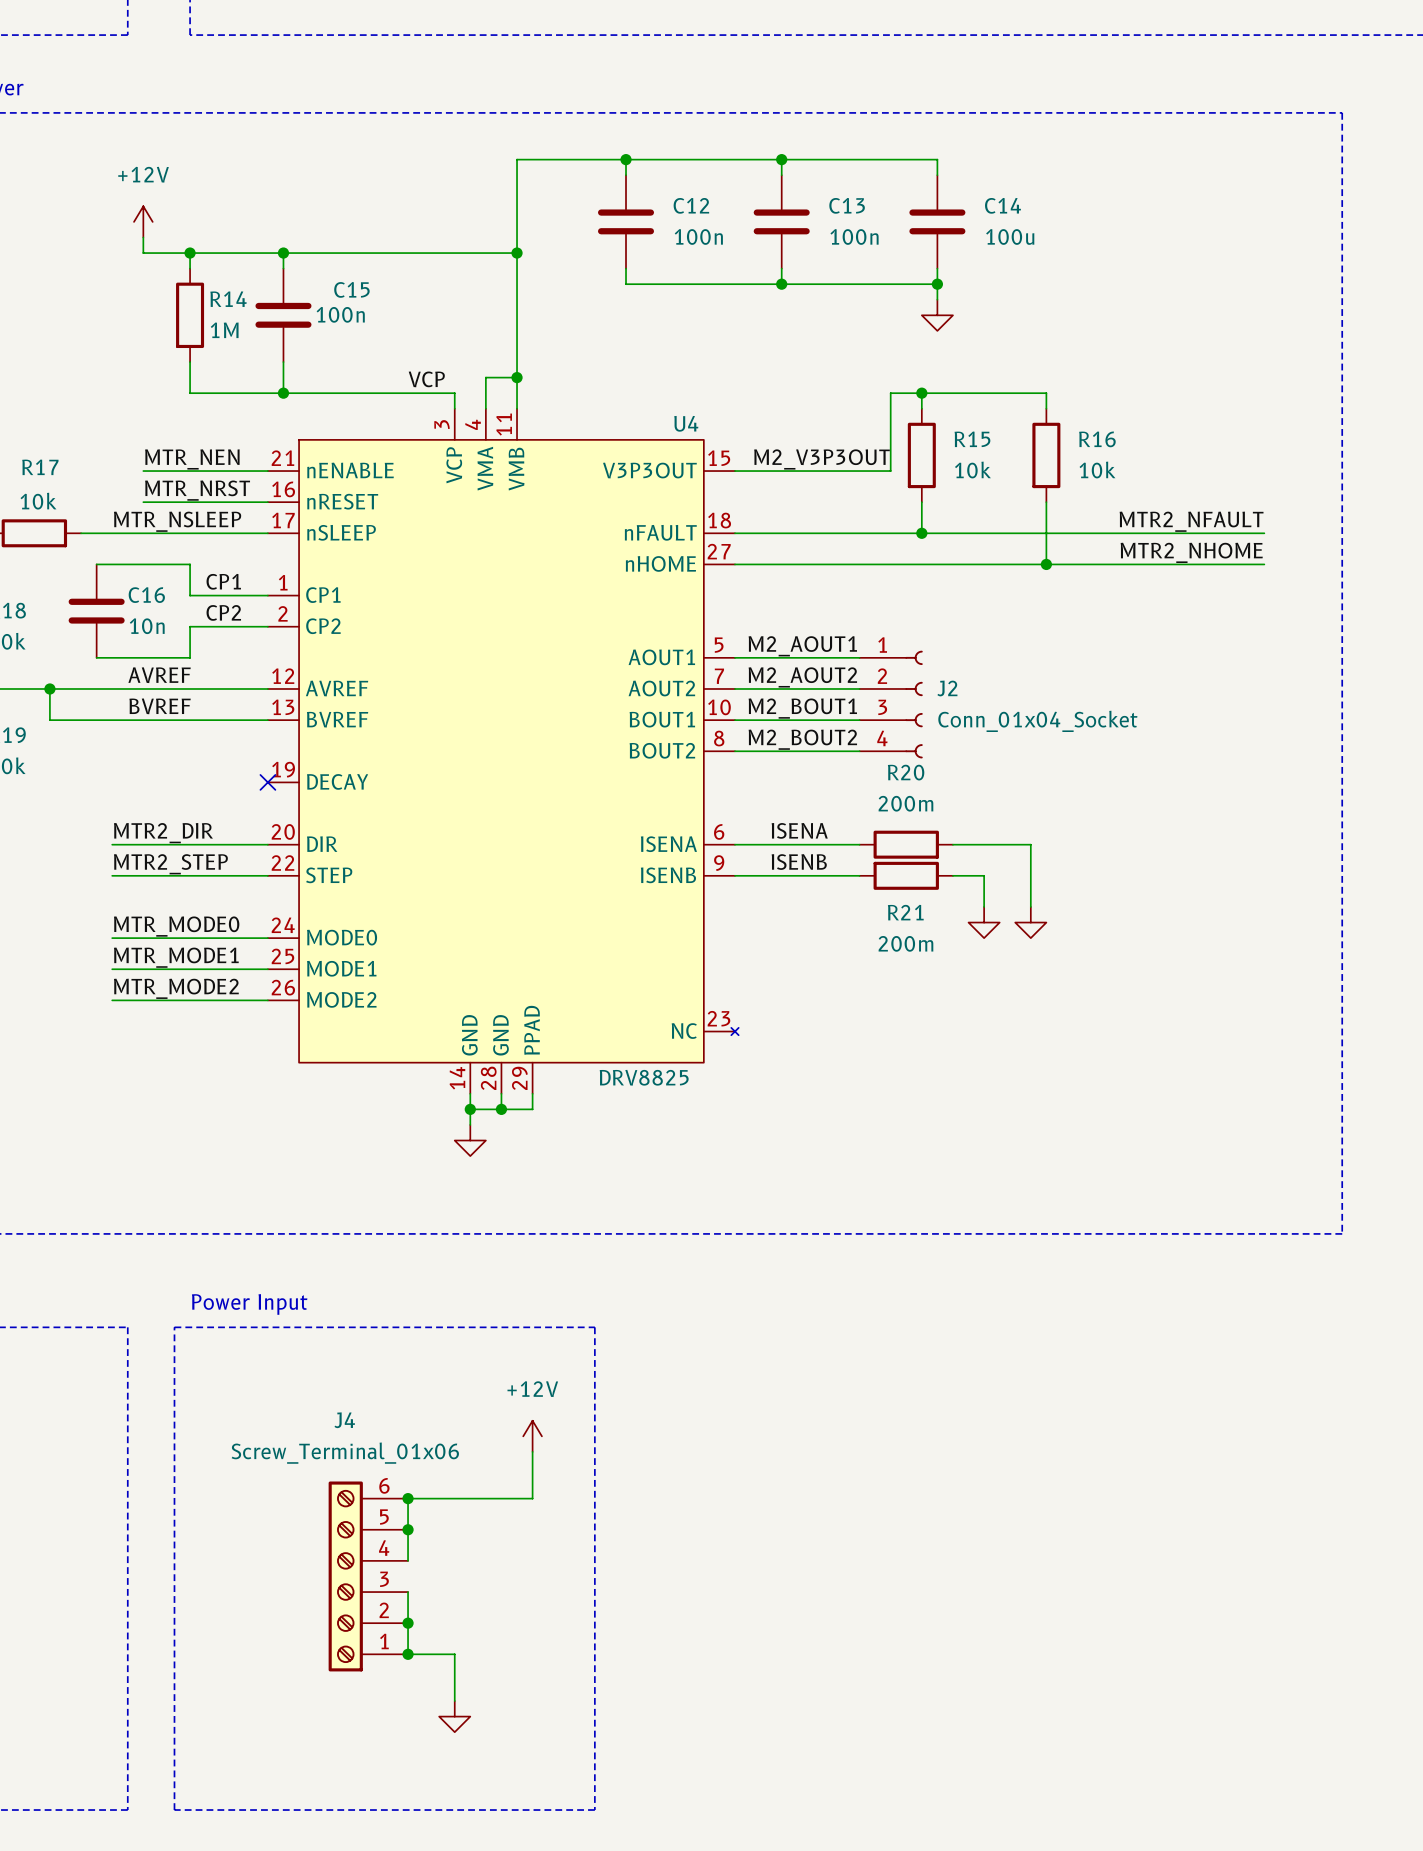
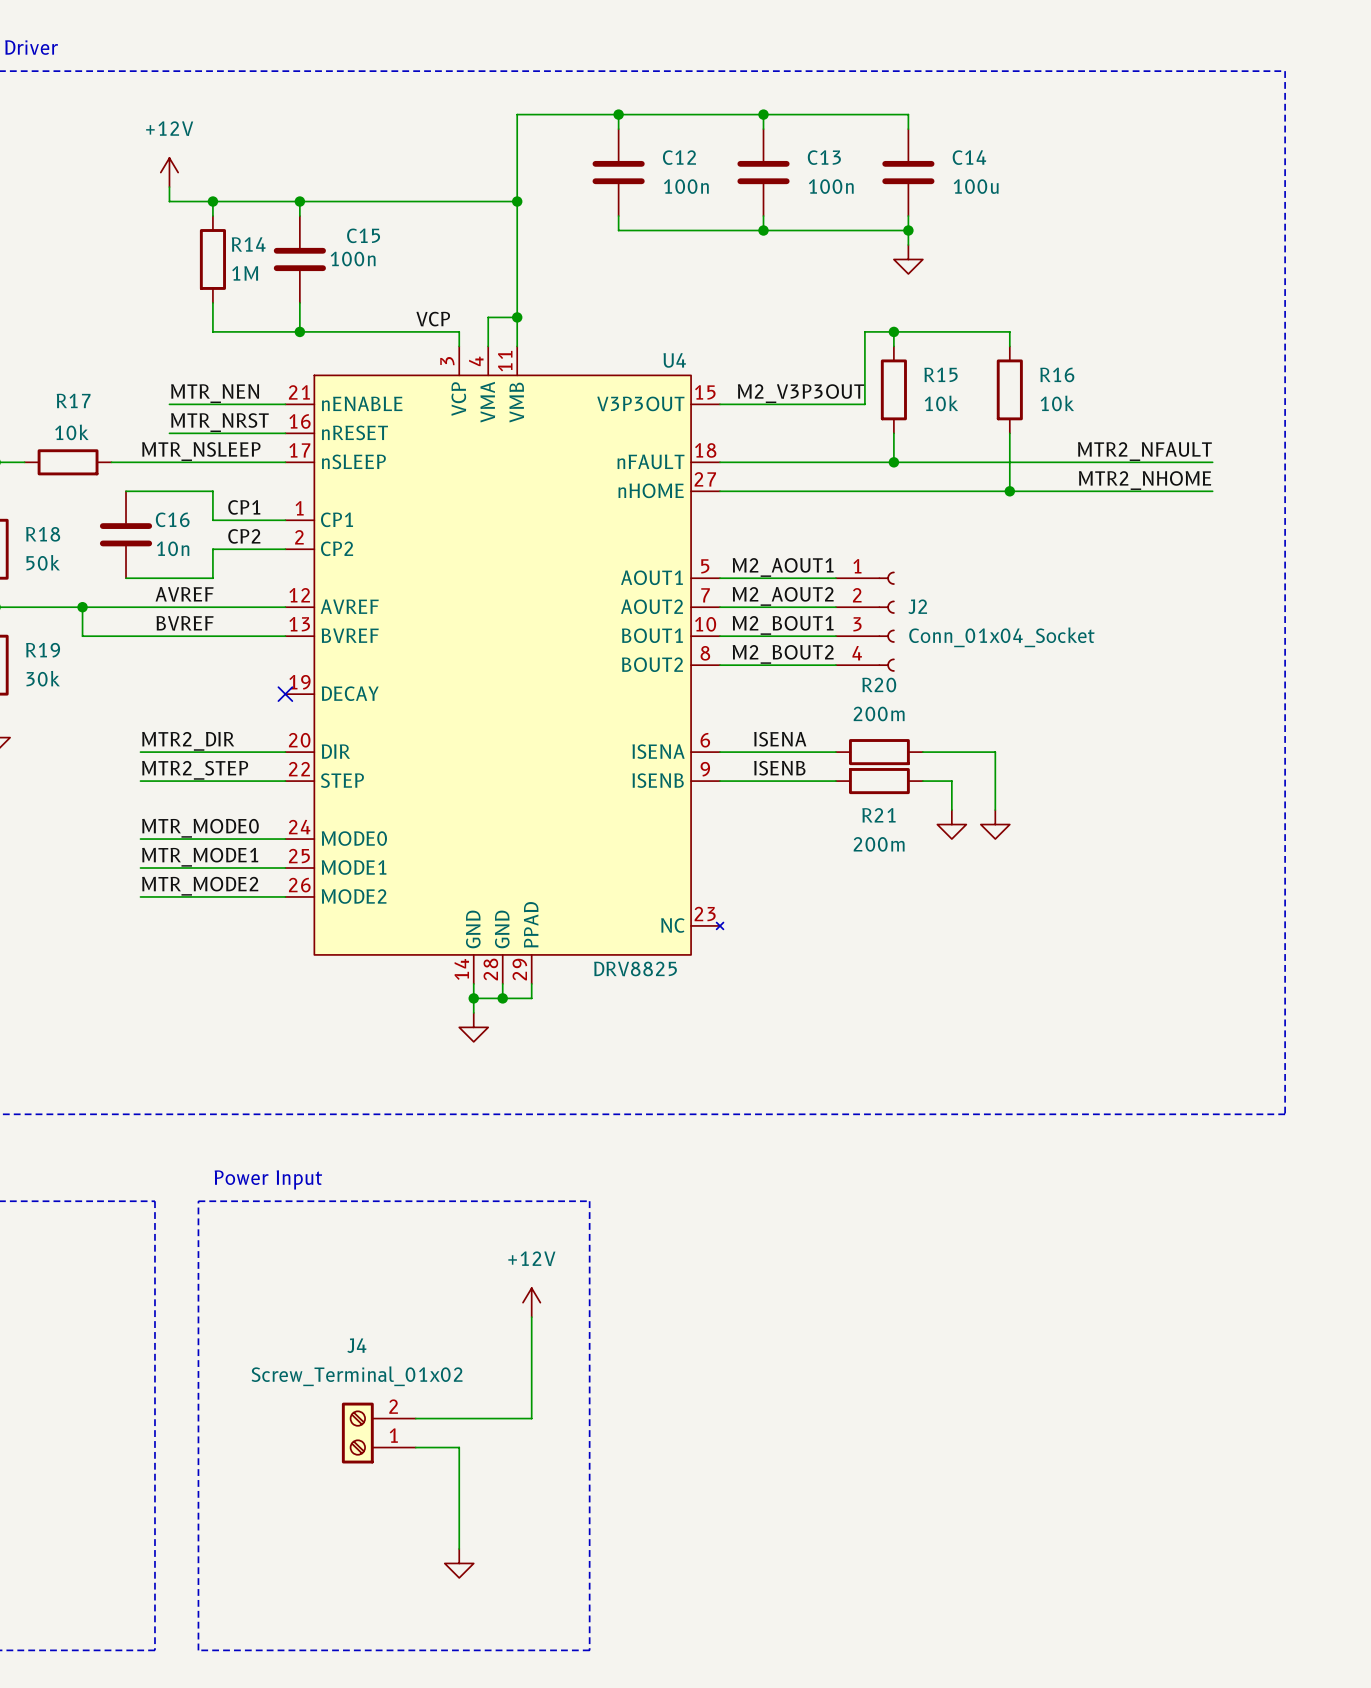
J4 name position: J4 (344, 1420) -> J4 (356, 1345)
J4 value: Screw_Terminal_01x06 (345, 1453) -> Screw_Terminal_01x02 (357, 1376)
J4 symbol: [328, 1481, 409, 1672] -> [341, 1402, 416, 1464]
junction: (408, 1498) -> none
wire: (532, 1498) (408, 1498) (408, 1560) -> (531, 1360) (531, 1418) (415, 1418)
junction: (408, 1529) -> none
wire: (408, 1592) (408, 1654) (454, 1654) -> (415, 1447) (459, 1447) (459, 1505)
junction: (408, 1623) -> none
junction: (408, 1654) -> none

